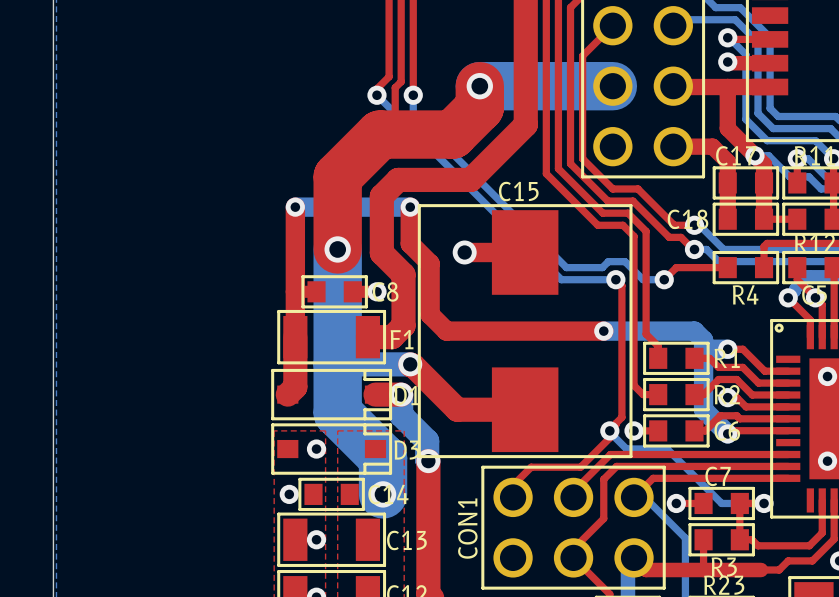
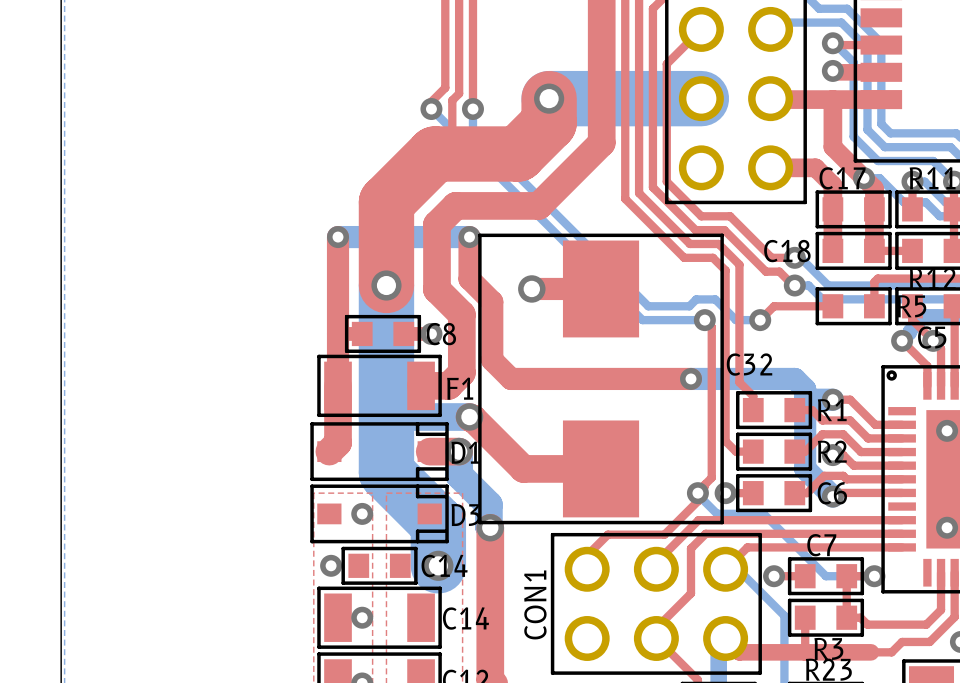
C15 name: C15 (518, 191) -> C32 (749, 364)
R4 name: R4 (745, 294) -> R5 (911, 306)
C13 name: C13 (406, 540) -> C14 (465, 618)

